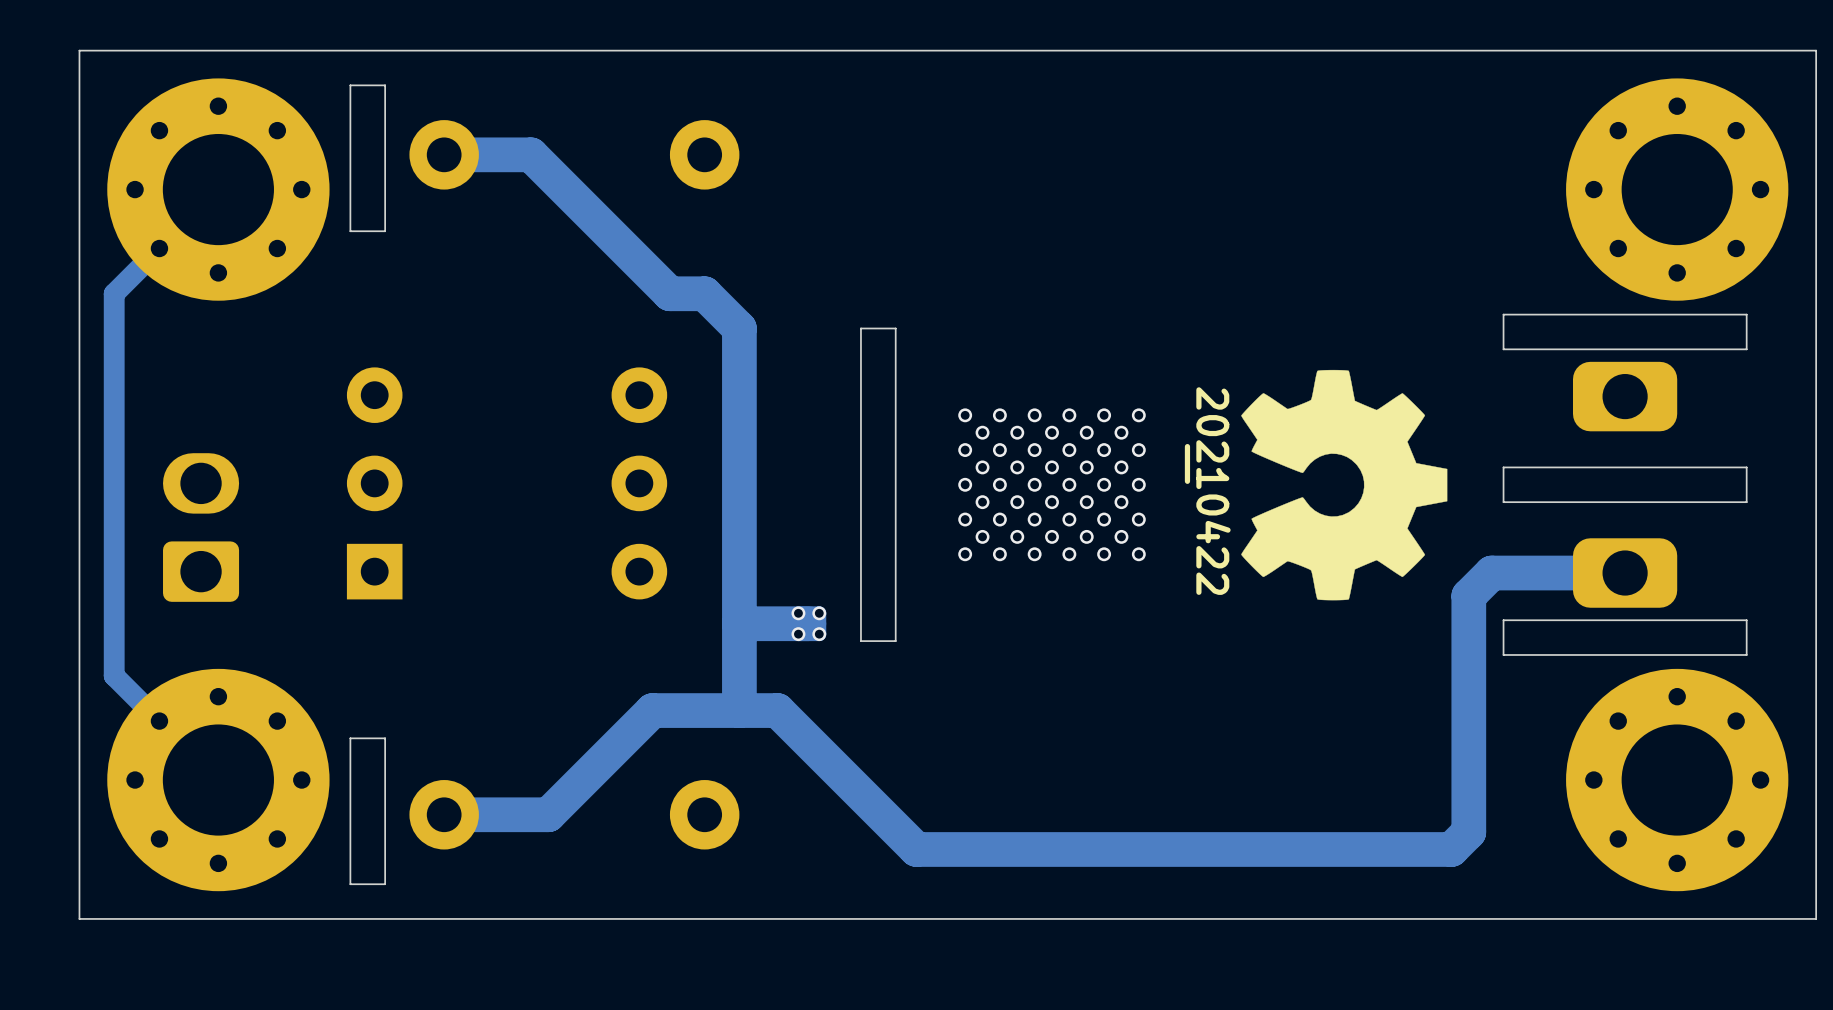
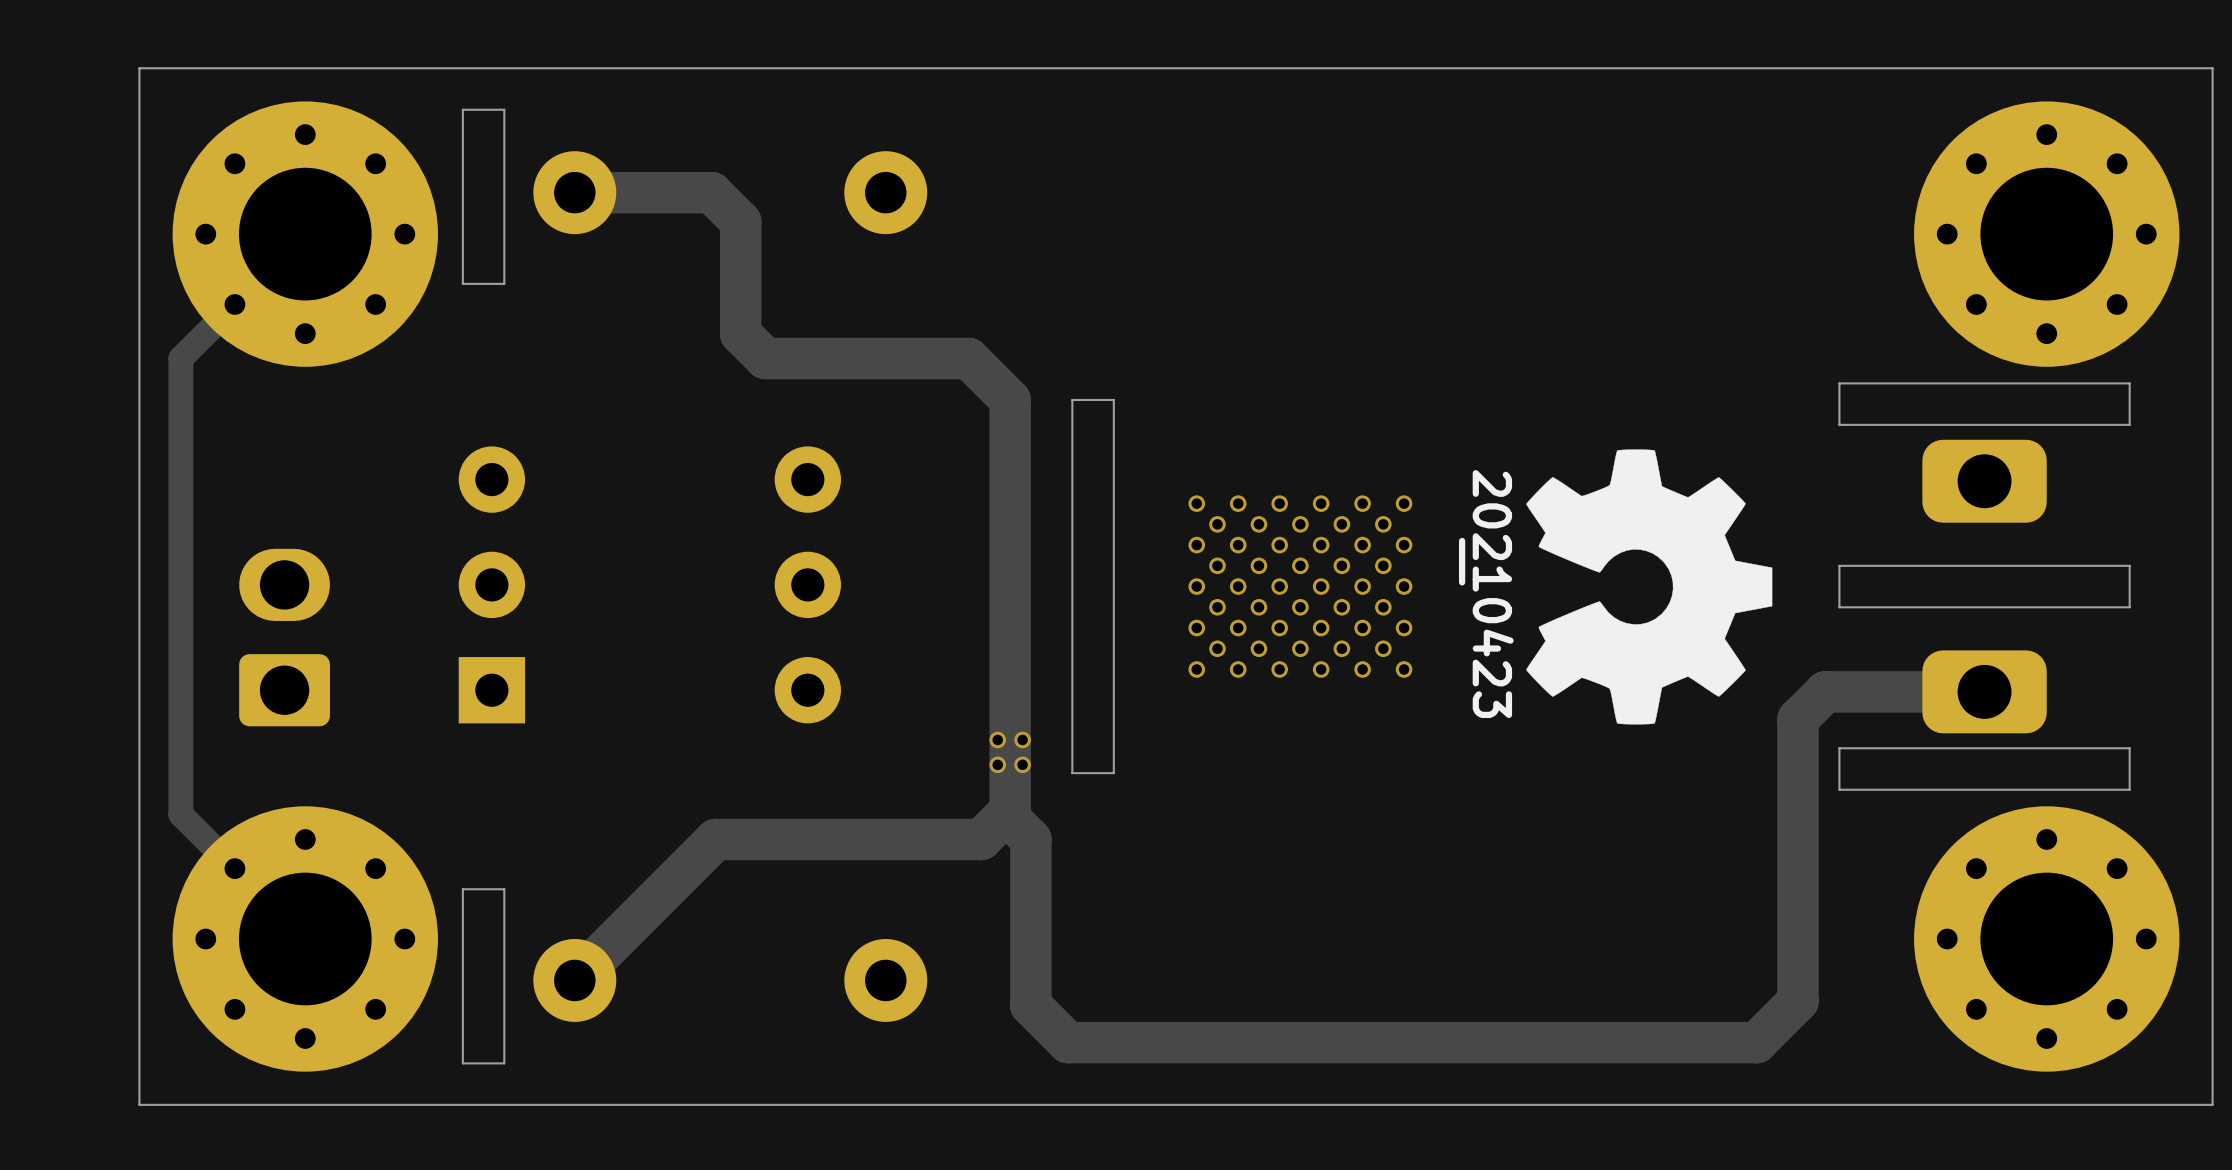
track: (531, 154) (669, 293) -> (678, 192) (711, 192) (740, 221) (740, 333) (765, 358) (844, 358)
track: (704, 293) (739, 328) (739, 710) -> (885, 358) (968, 358) (1010, 399) (1010, 810) (981, 839) (715, 839) (574, 980)
drawing shape: [1184, 387, 1231, 595] -> [1459, 470, 1514, 719]
track: (808, 623) (739, 623) -> none
track: (444, 814) (548, 814) (652, 710) (777, 710) (916, 849) (1451, 849) -> (1006, 814) (1030, 839) (1030, 1005) (1068, 1042) (1756, 1042) (1777, 1021)

